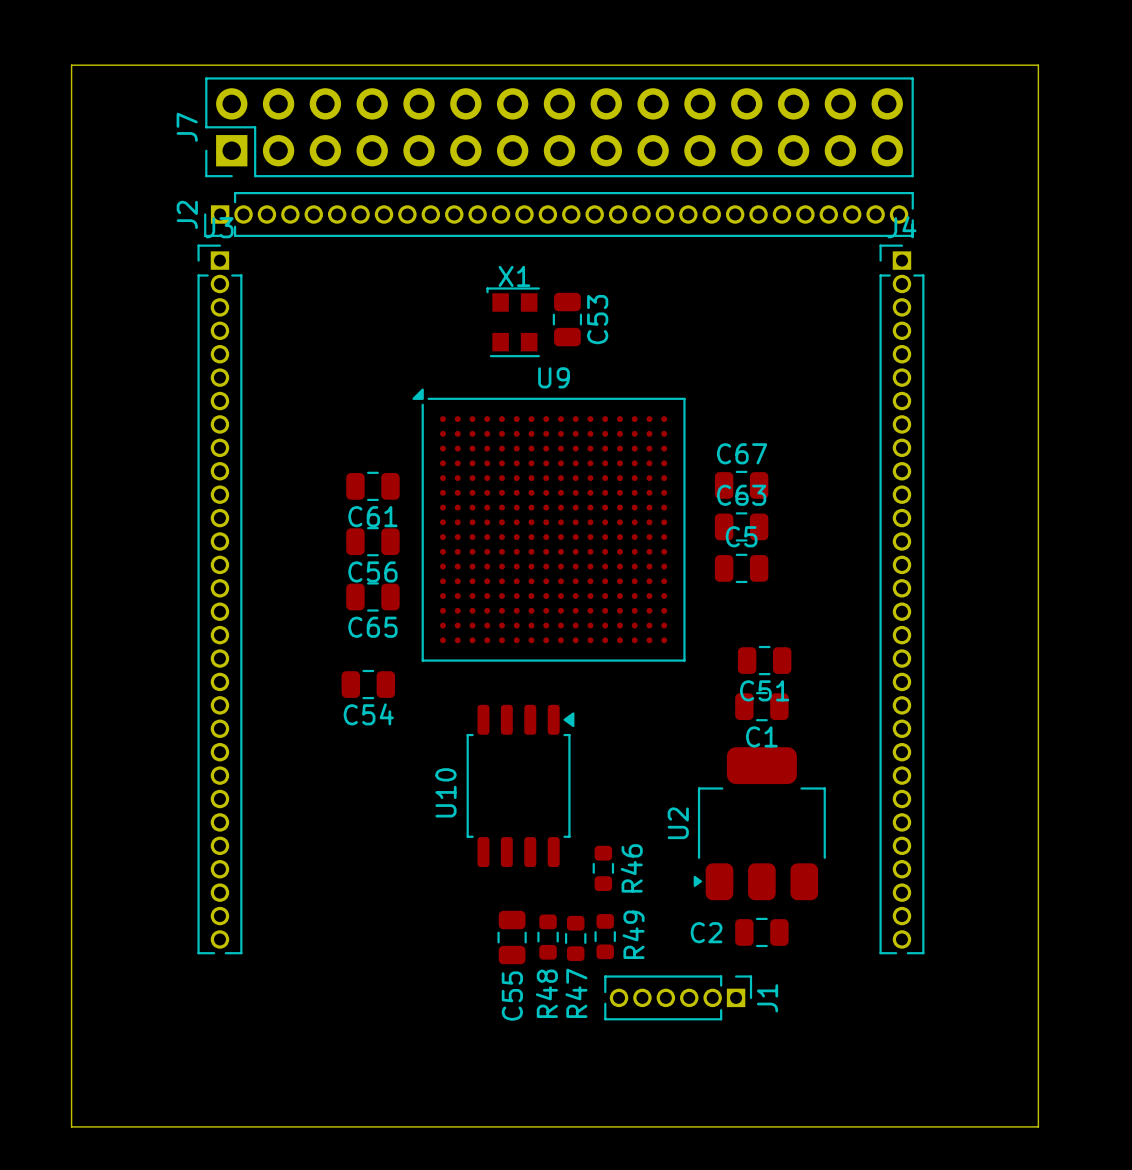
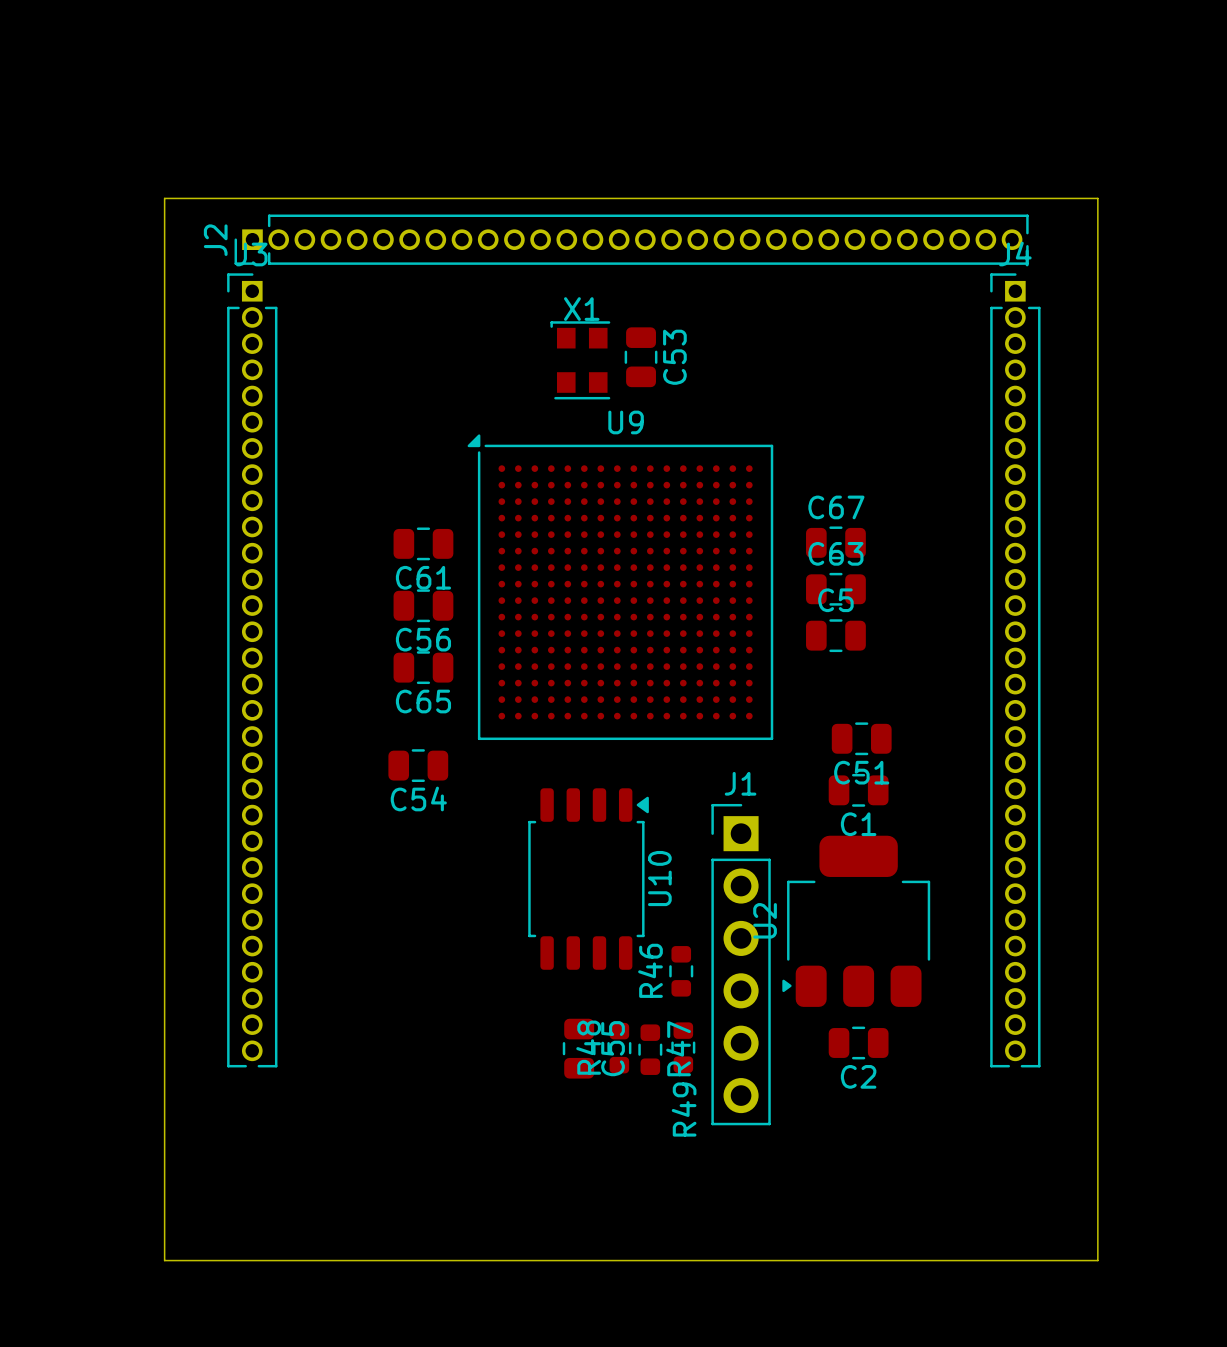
J7: (559, 127) -> none
U10 name position: U10 (445, 792) -> U10 (659, 878)
R46 name position: R46 (631, 868) -> R46 (650, 970)
C2 name position: C2 (706, 932) -> C2 (858, 1076)
R49 name position: R49 (633, 934) -> R49 (684, 1109)
J1 footprint: [604, 975, 753, 1021] -> [711, 803, 771, 1126]
R48 name position: R48 (546, 993) -> R48 (588, 1047)
R47 name position: R47 (576, 993) -> R47 (678, 1048)
C55 name position: C55 (512, 996) -> C55 (613, 1048)
J1 name position: J1 (767, 998) -> J1 (740, 783)
board edge: (141, 1126) (71, 1126) (71, 65) (1038, 65) (1038, 1126) (975, 1126) -> (164, 1260) (164, 198) (1097, 198) (1097, 1260)

